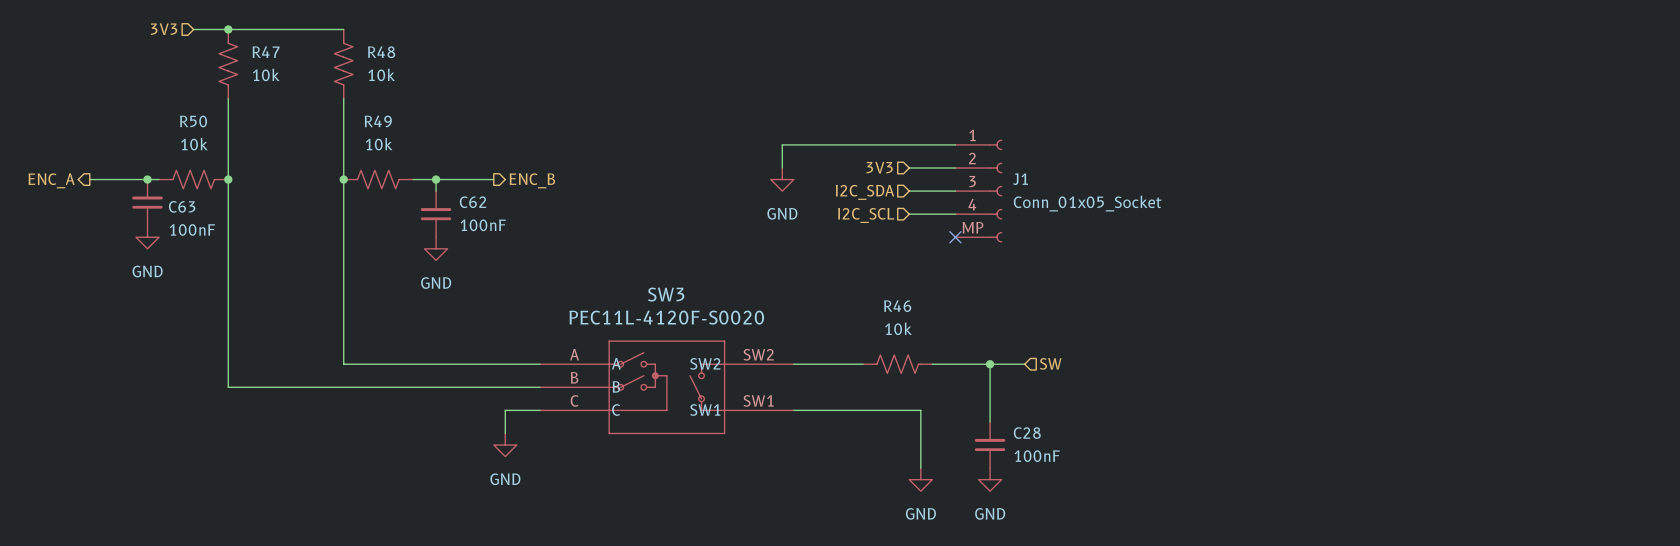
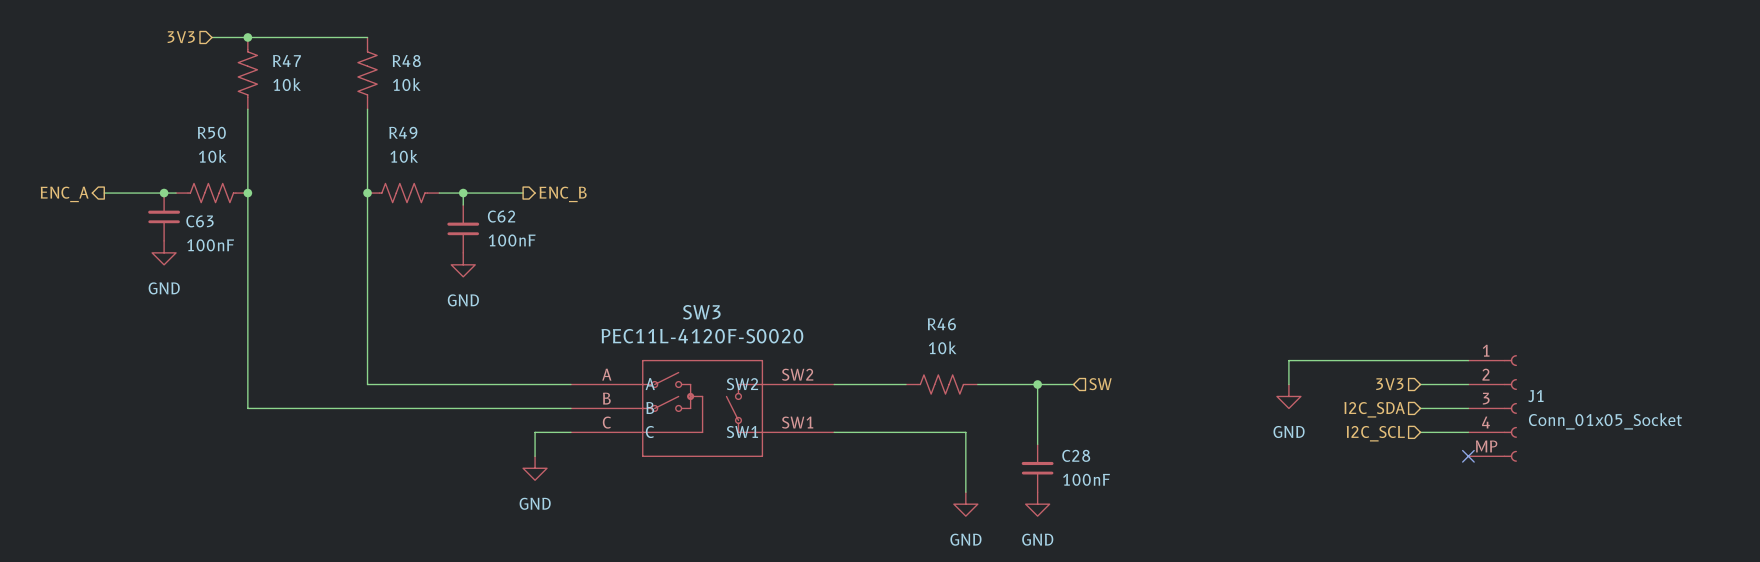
wire: (955, 144) (782, 144) (782, 168) -> none
hierarchical label: 3V3 (879, 167) -> none
wire: (909, 168) (955, 168) -> none
power symbol: GND (782, 179) -> none
wire: (909, 191) (955, 191) -> none
J1 position: (978, 191) -> (1492, 408)
hierarchical label: I2C_SDA (864, 192) -> none
wire: (909, 214) (955, 214) -> none
hierarchical label: I2C_SCL (866, 215) -> none
no-connect mark: (955, 237) -> none
wire: none -> (1468, 360) (1288, 360) (1288, 384)
hierarchical label: none -> 3V3 (1389, 384)
wire: none -> (1420, 384) (1468, 384)
power symbol: none -> GND (1288, 396)
wire: none -> (1420, 408) (1468, 408)
hierarchical label: none -> I2C_SDA (1374, 409)
wire: none -> (1420, 432) (1468, 432)
hierarchical label: none -> I2C_SCL (1375, 433)
no-connect mark: none -> (1468, 456)

